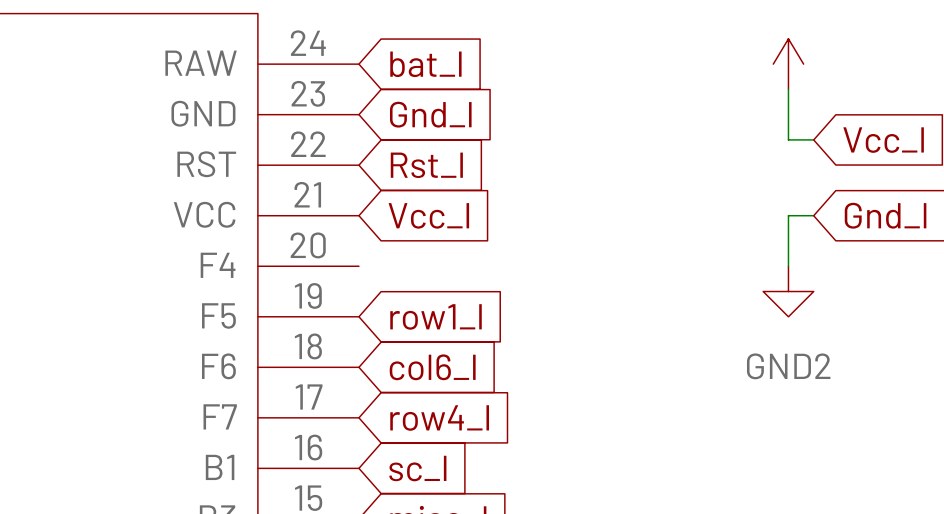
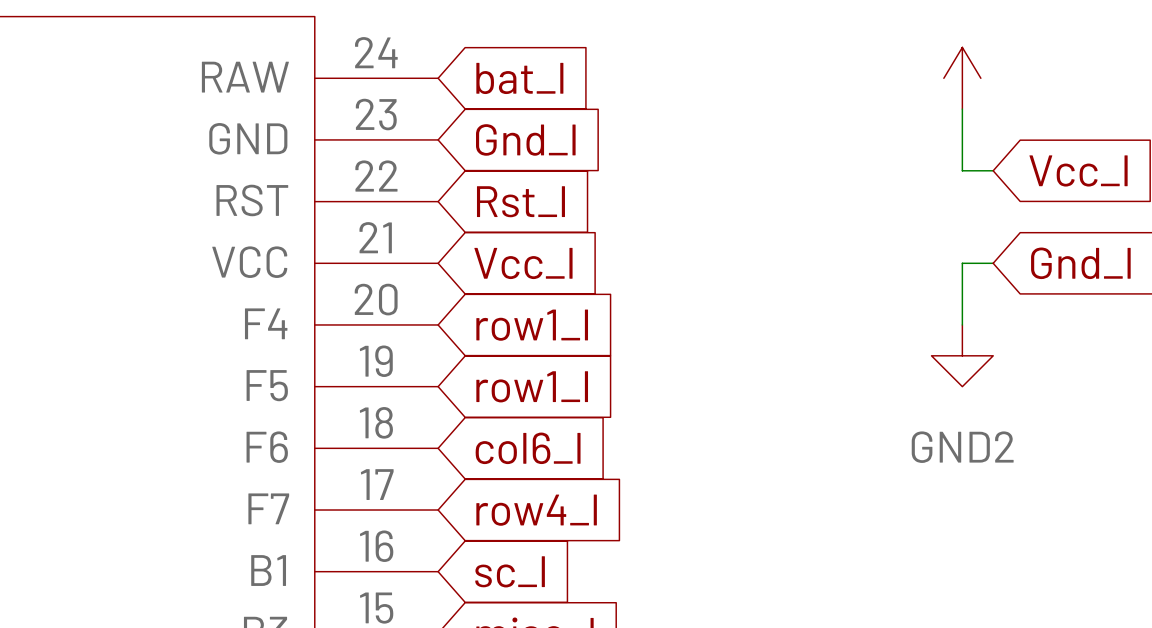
global label: none -> row1_l (532, 325)

